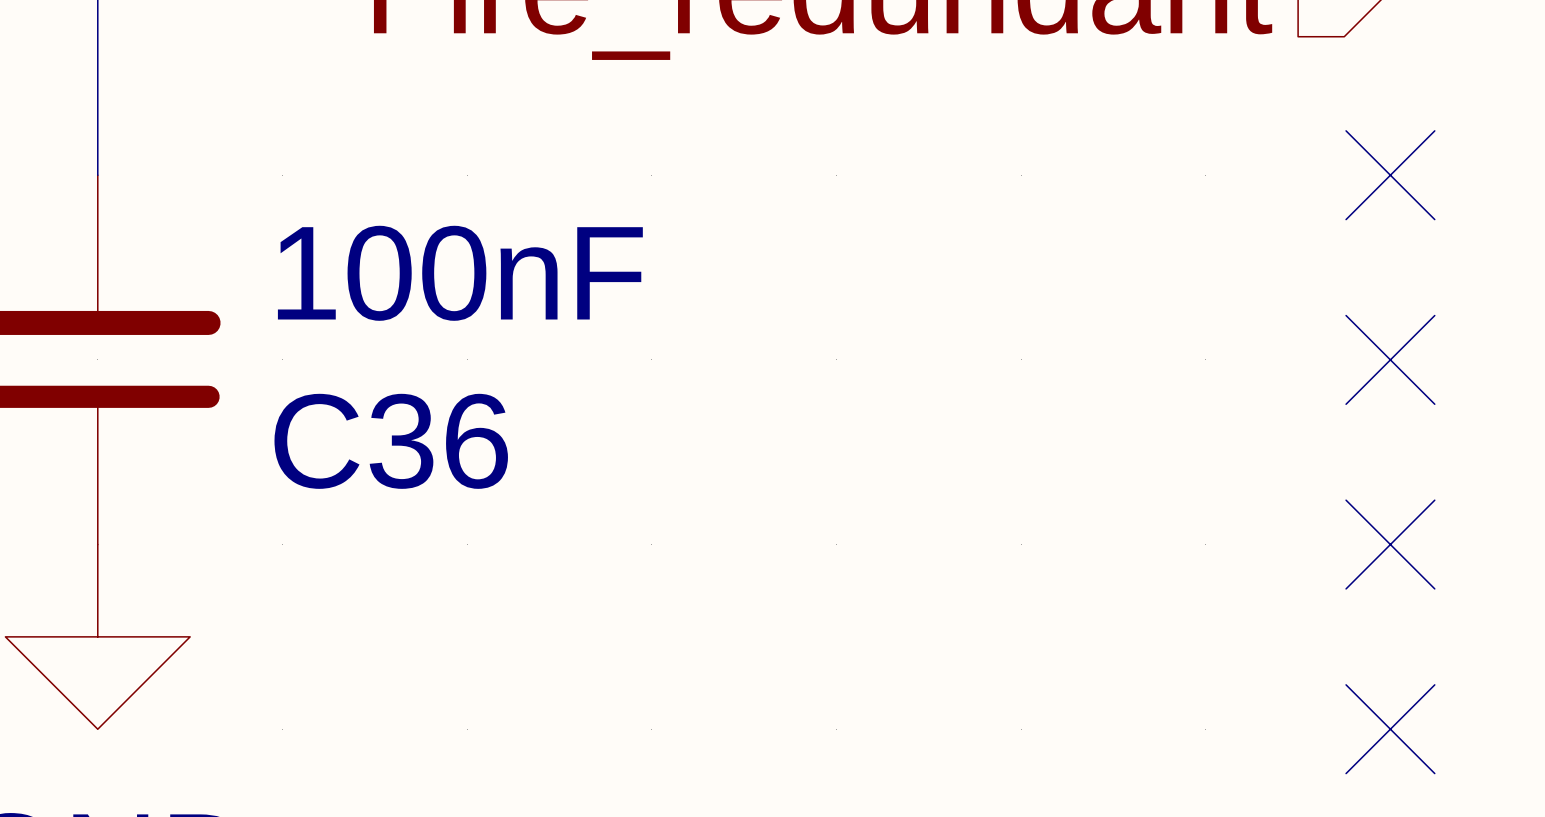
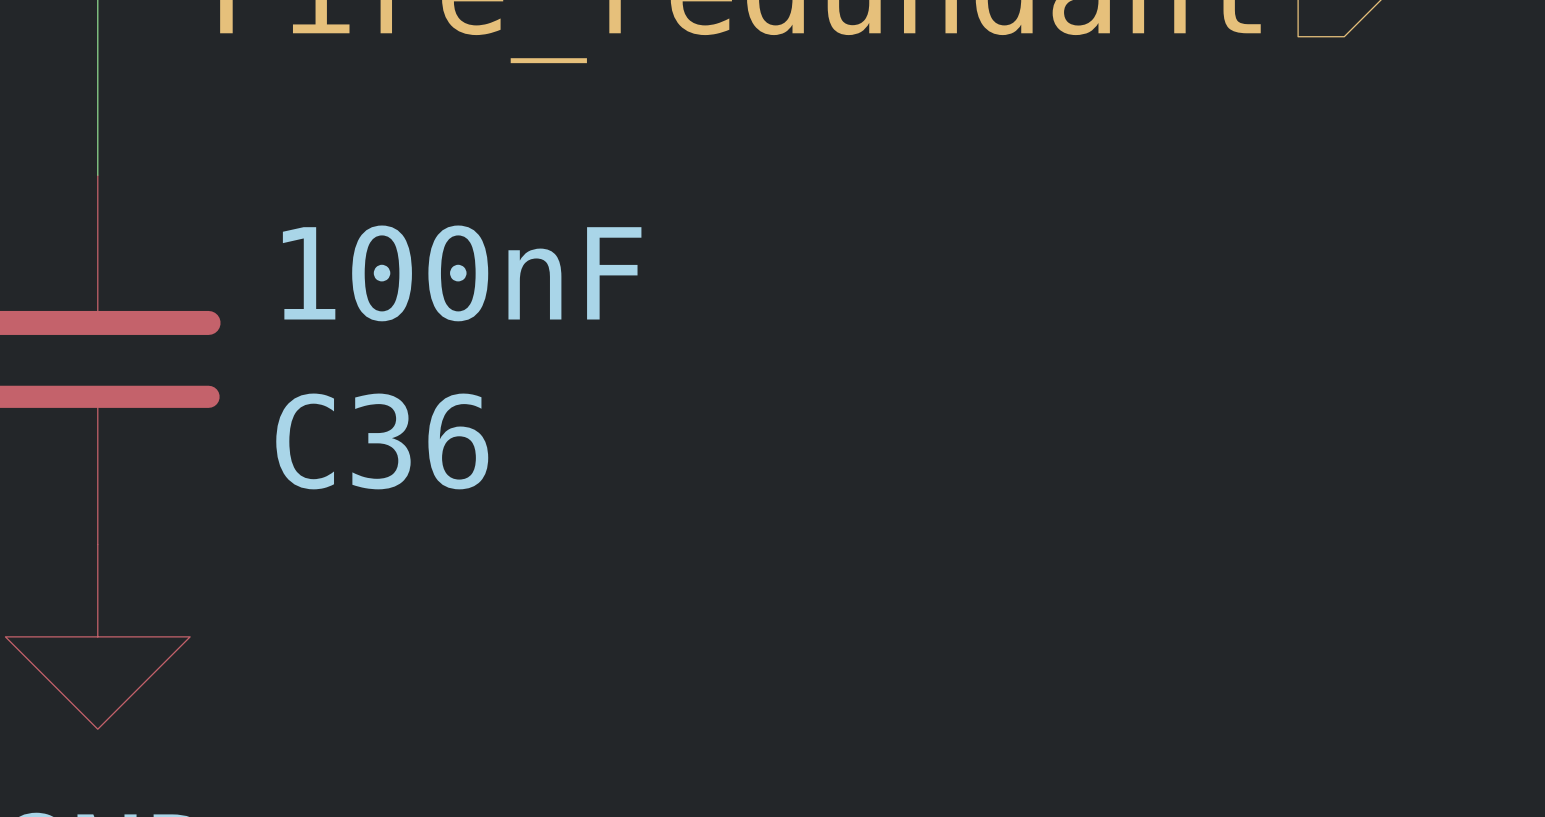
no-connect mark: (1390, 175) -> none
no-connect mark: (1390, 359) -> none
no-connect mark: (1390, 544) -> none
no-connect mark: (1390, 729) -> none

